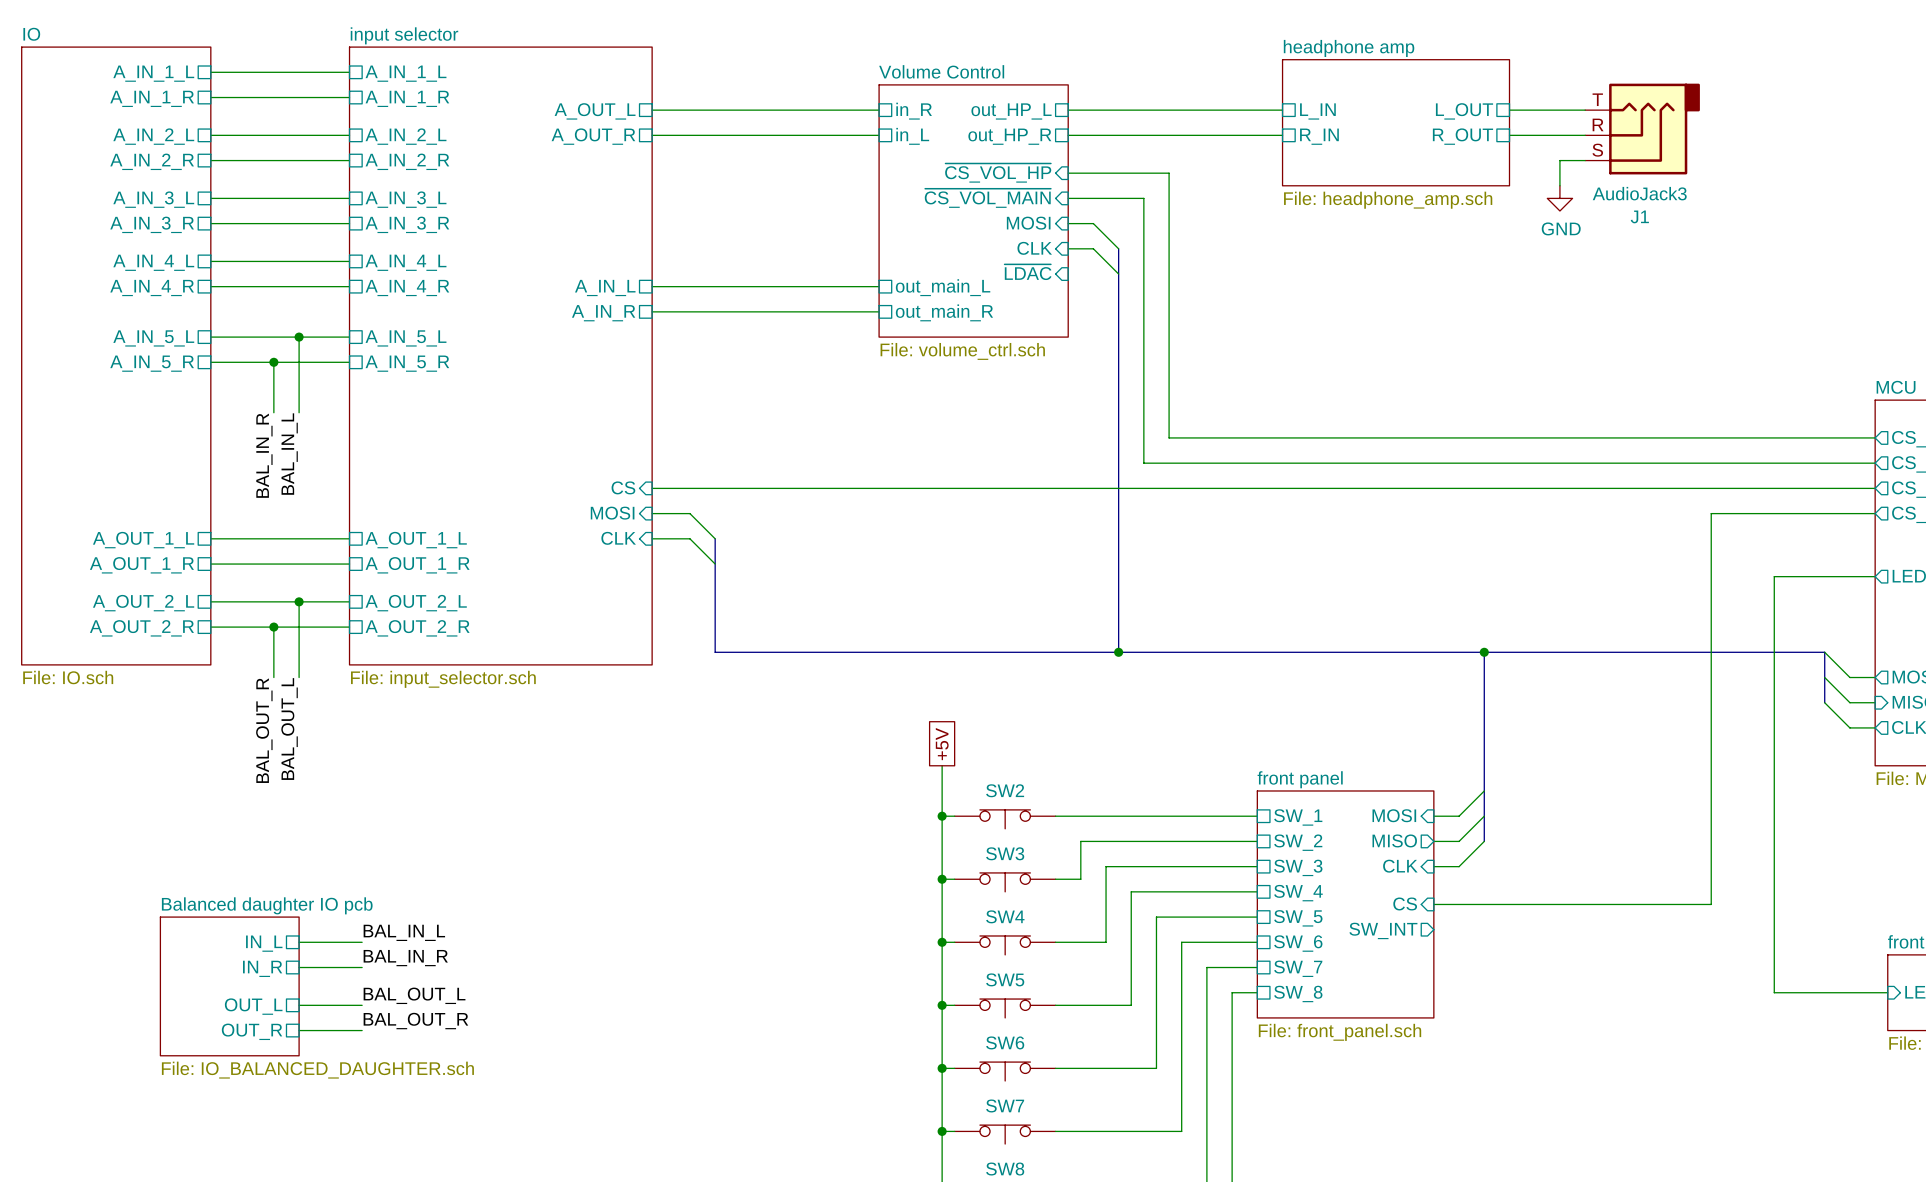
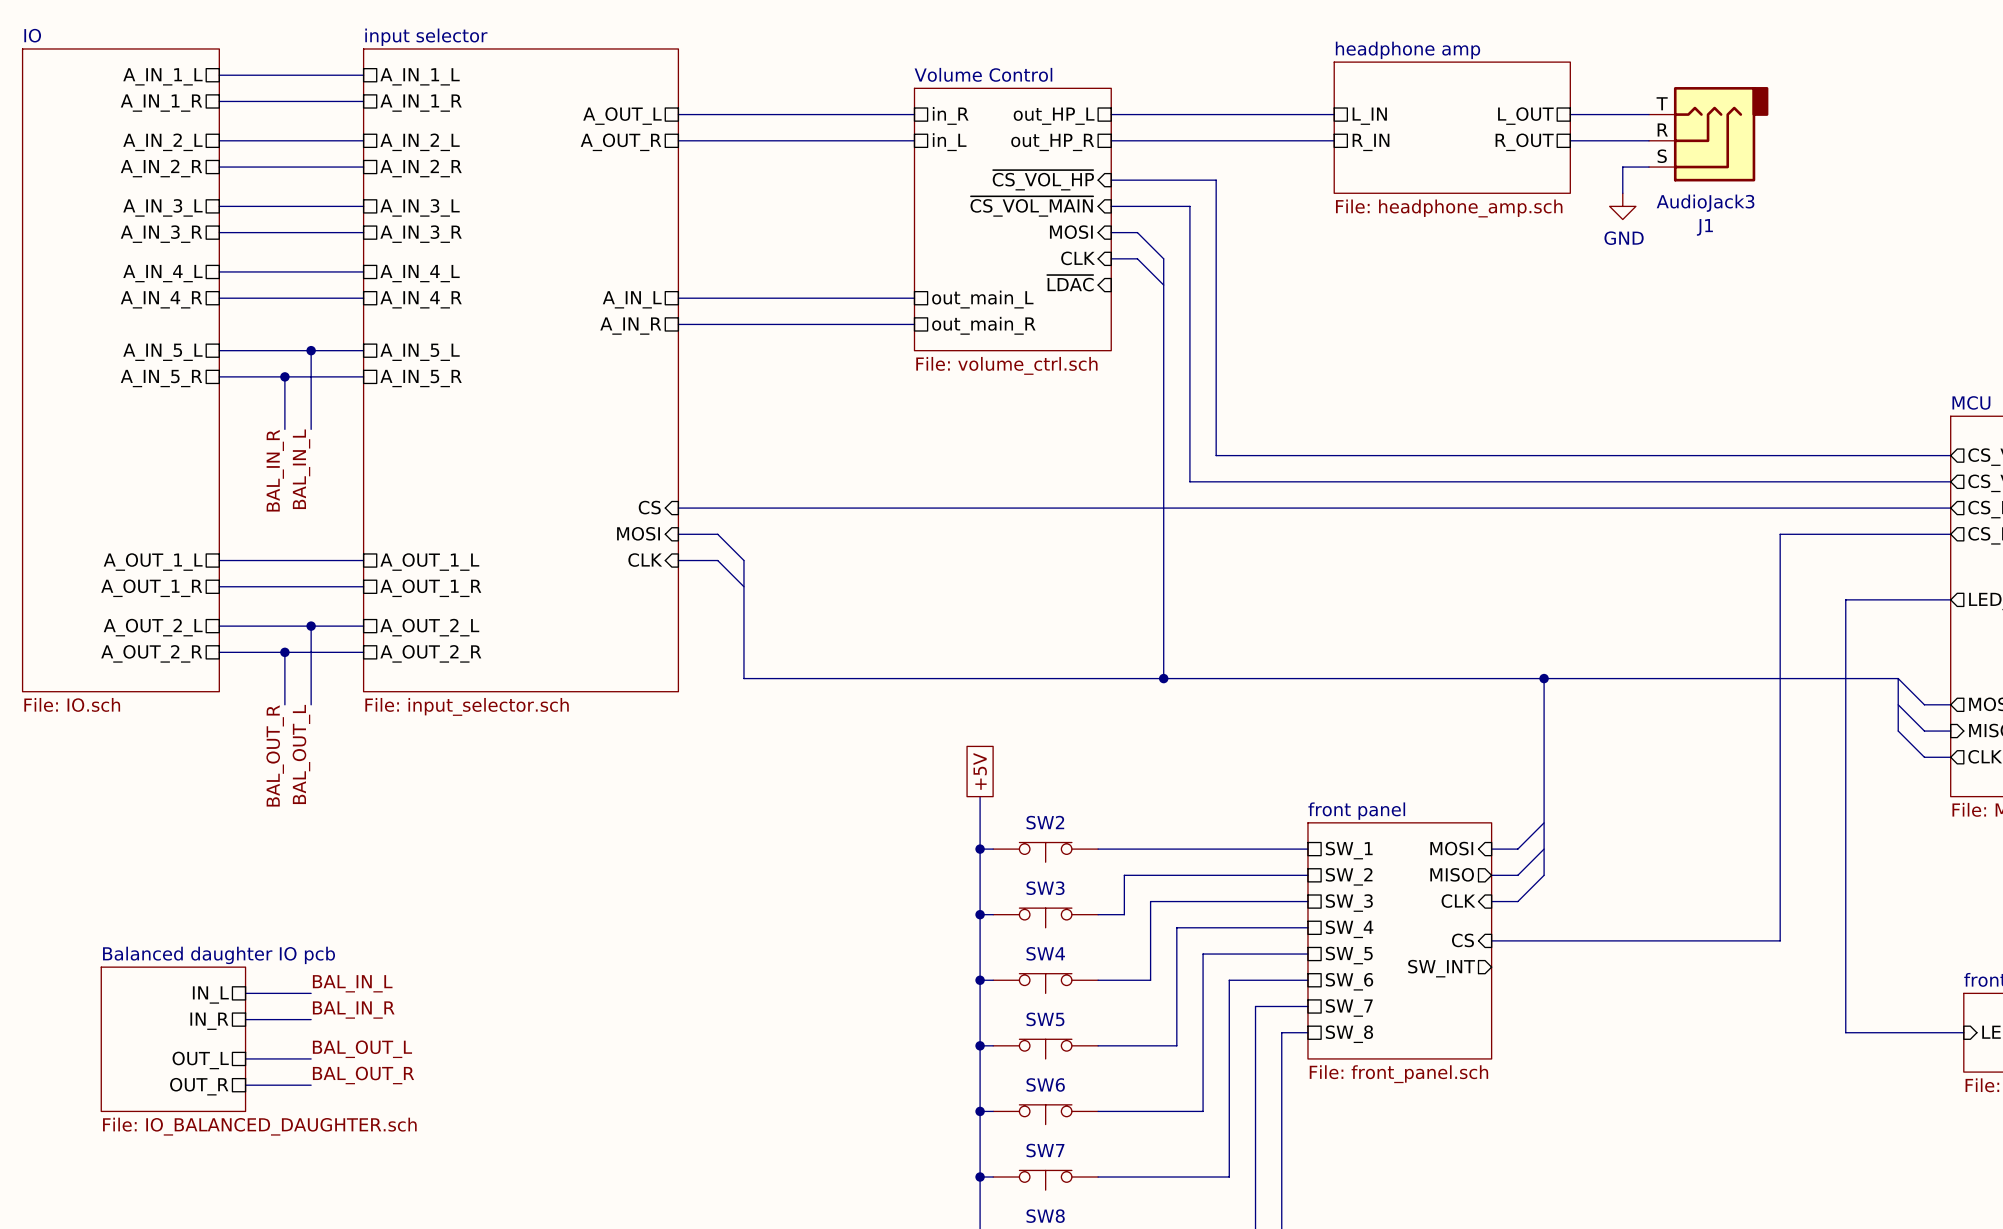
label position: BAL_IN_L (404, 932) -> BAL_IN_L (352, 983)
wire: (299, 942) (362, 942) -> (245, 993) (311, 993)
sheet pin position: IN_L (264, 943) -> IN_L (210, 995)
label position: BAL_IN_R (405, 958) -> BAL_IN_R (353, 1010)
wire: (299, 967) (362, 967) -> (245, 1019) (311, 1019)
sheet pin position: IN_R (262, 968) -> IN_R (209, 1021)
sheet Balanced daughter IO pcb position: (229, 986) -> (173, 1039)
label position: BAL_OUT_L (414, 995) -> BAL_OUT_L (362, 1049)
wire: (299, 1005) (362, 1005) -> (245, 1058) (311, 1058)
sheet pin position: OUT_L (253, 1006) -> OUT_L (200, 1060)
label position: BAL_OUT_R (415, 1021) -> BAL_OUT_R (363, 1075)
wire: (299, 1030) (362, 1030) -> (245, 1085) (311, 1085)
sheet pin position: OUT_R (252, 1031) -> OUT_R (199, 1086)

